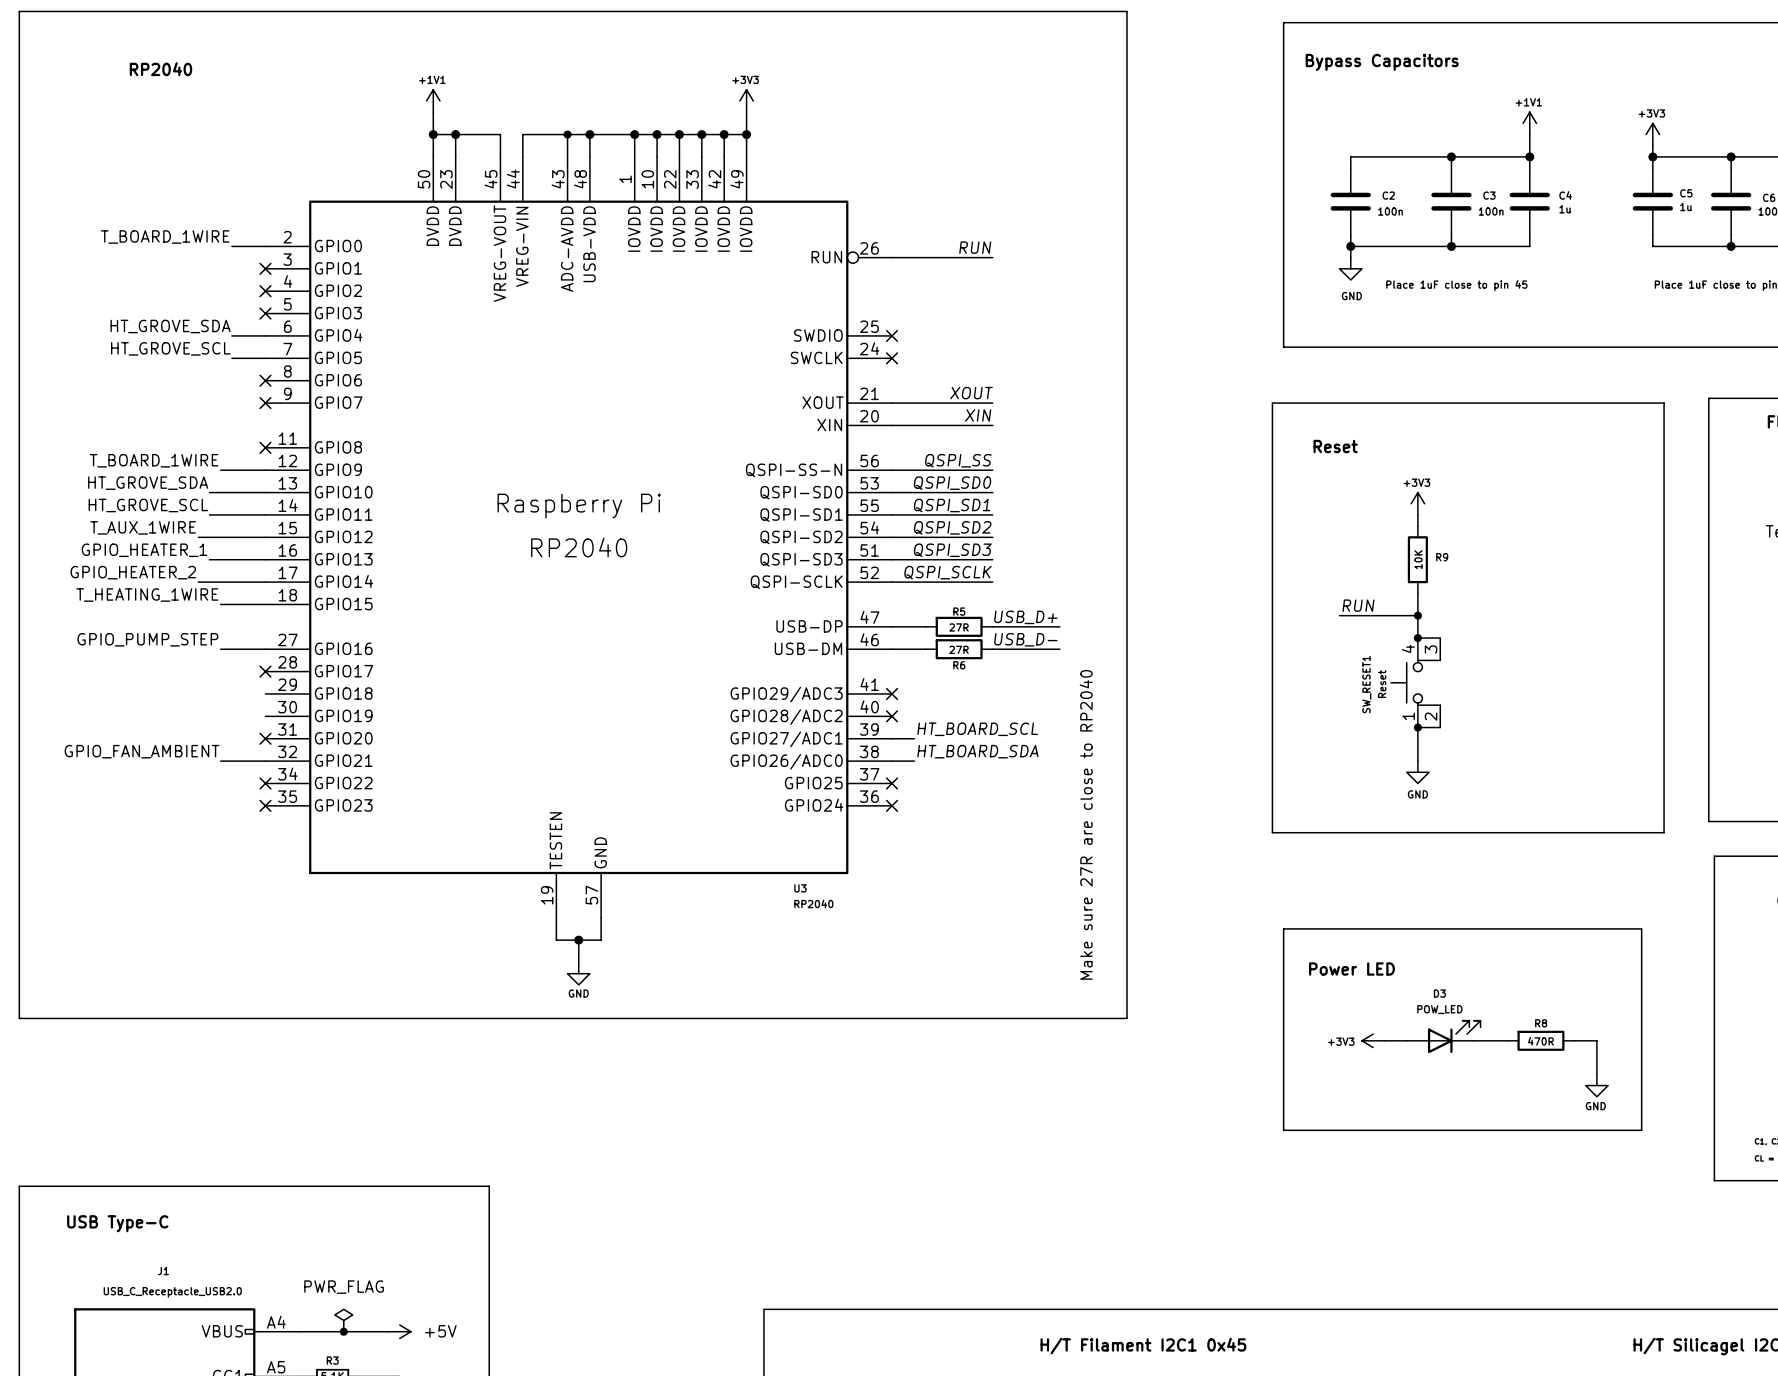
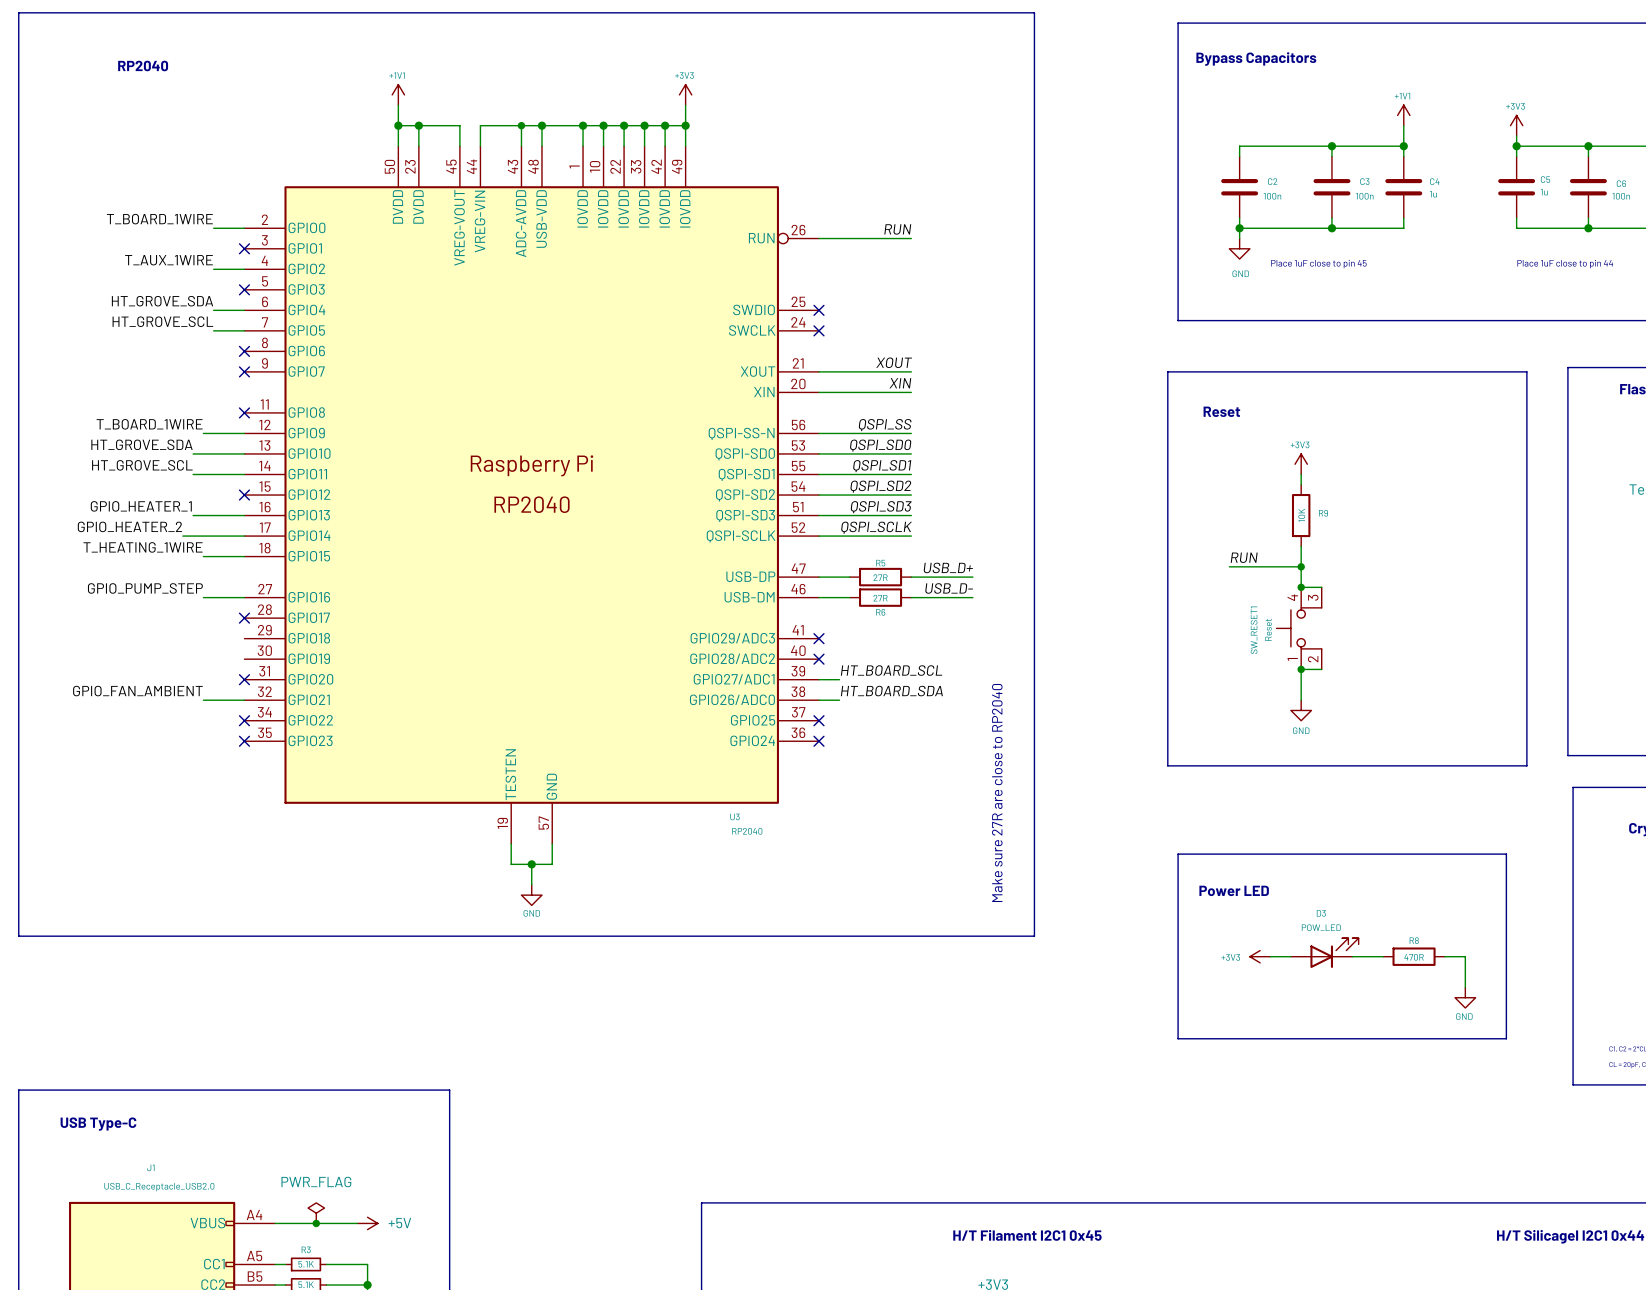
label: none -> T_AUX_1WIRE (168, 260)
wire: none -> (213, 269) (244, 269)
no-connect mark: (265, 291) -> none
label: T_AUX_1WIRE (143, 527) -> none
wire: (198, 537) (265, 537) -> none
no-connect mark: none -> (244, 495)

